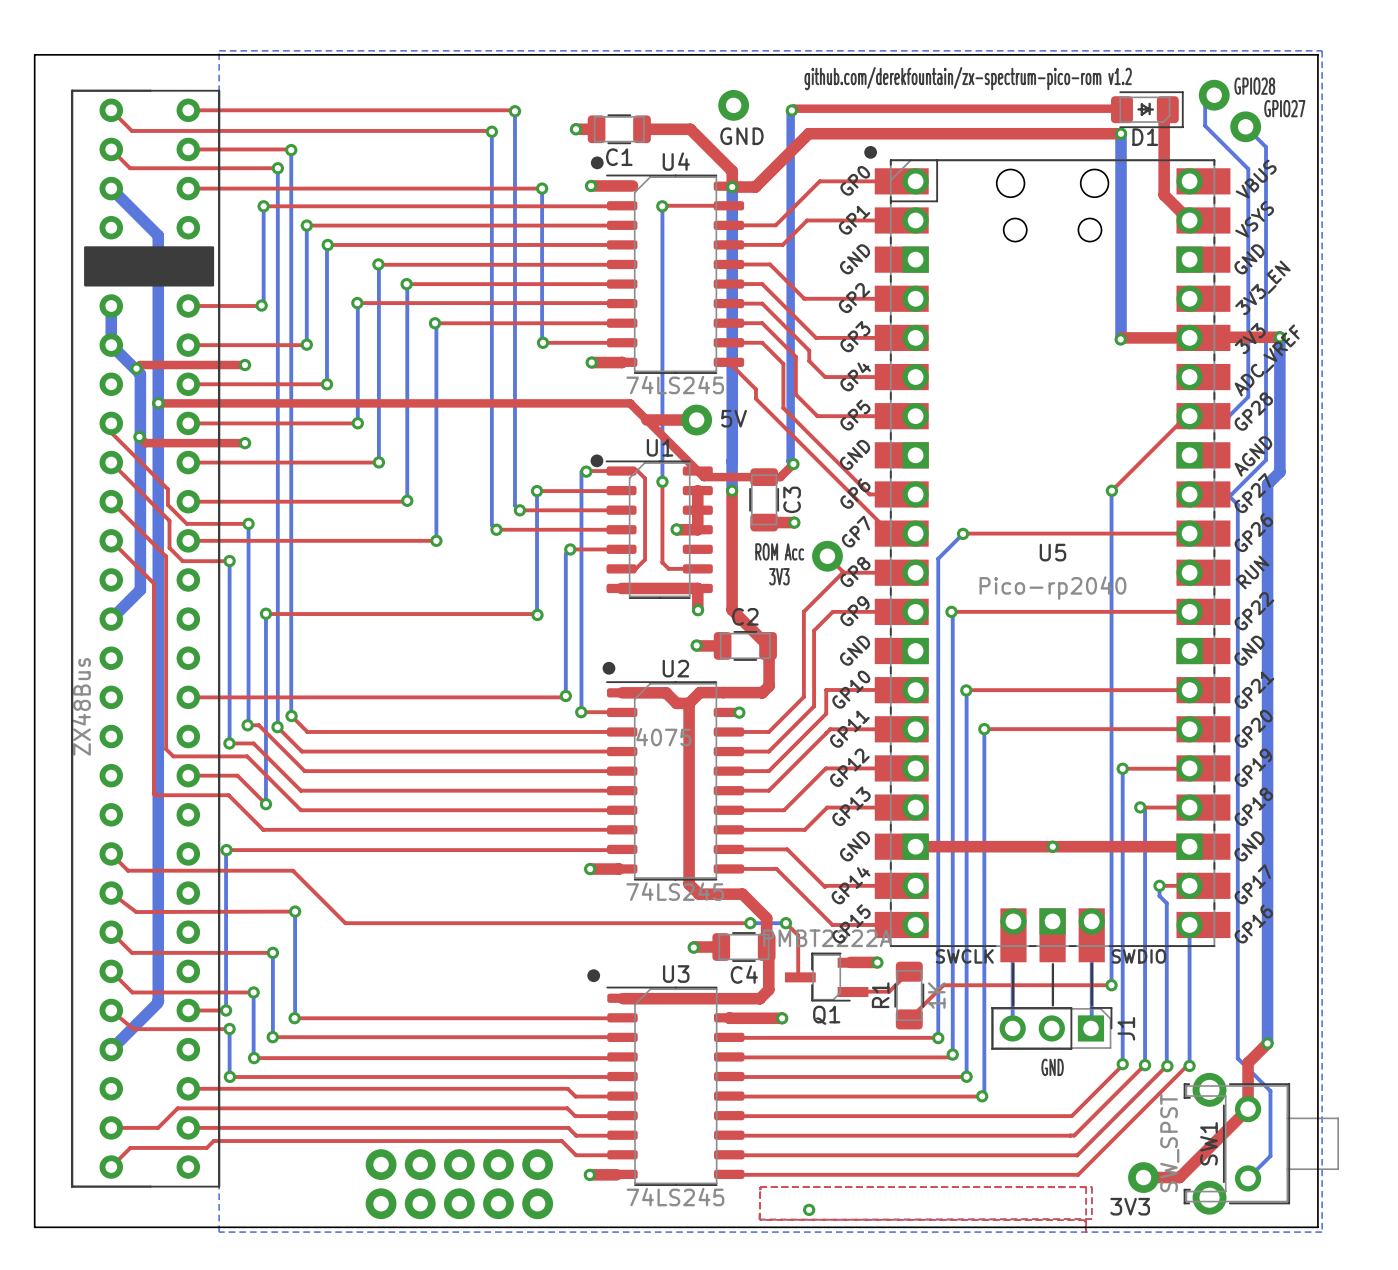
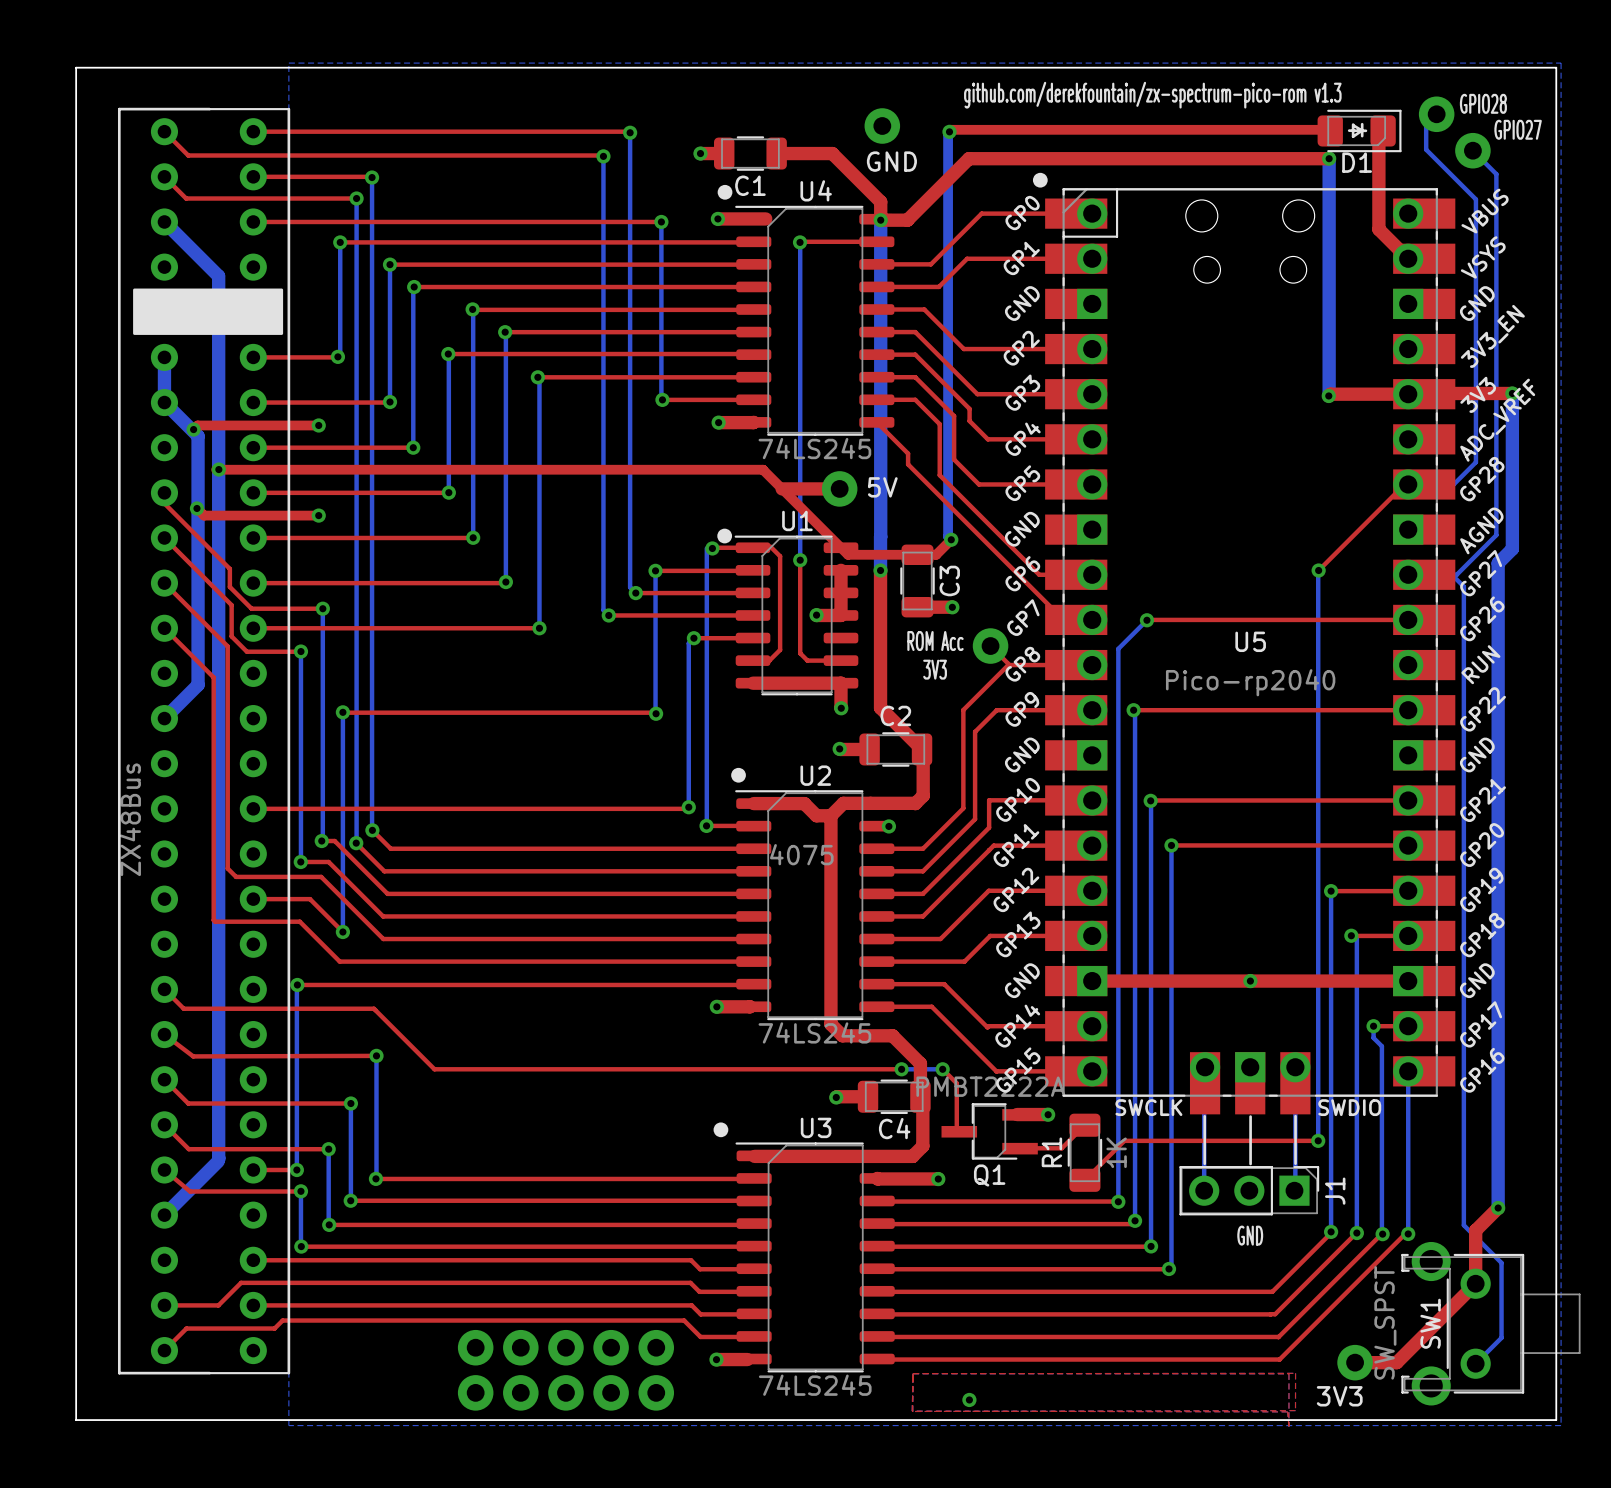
text: github.com/derekfountain/zx-spectrum-pico-rom v1.2 (968, 78) -> github.com/derekfountain/zx-spectrum-pico-rom v1.3 (1152, 95)

